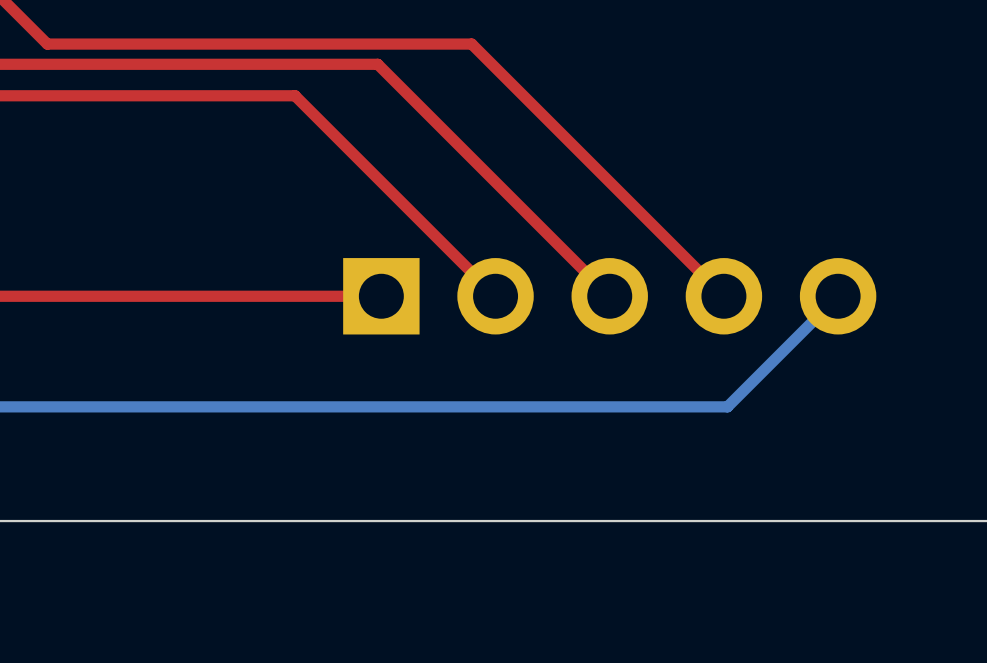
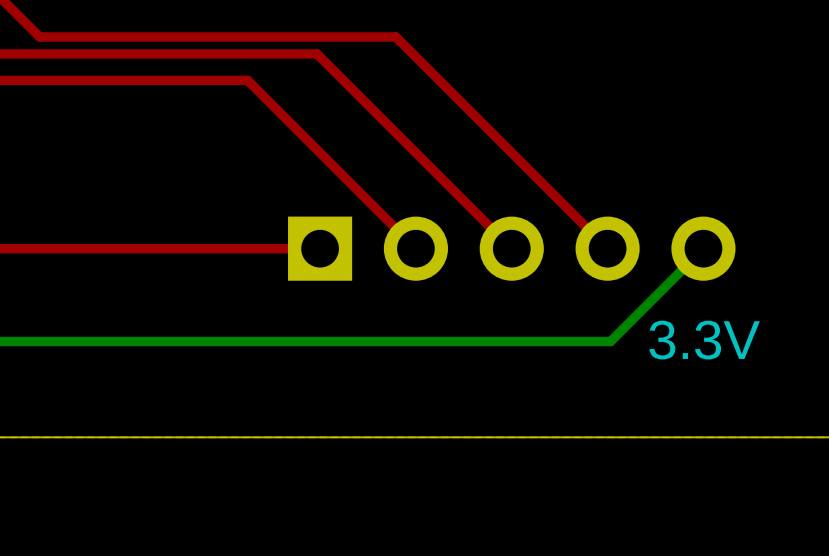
text: none -> 3.3V (704, 340)

